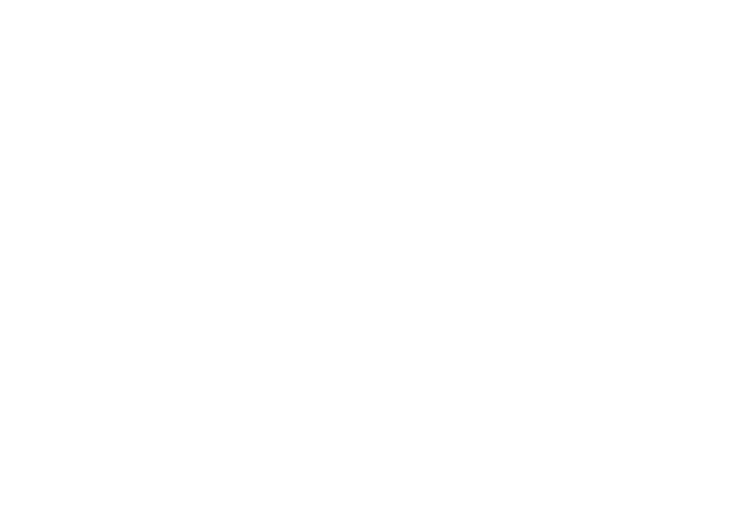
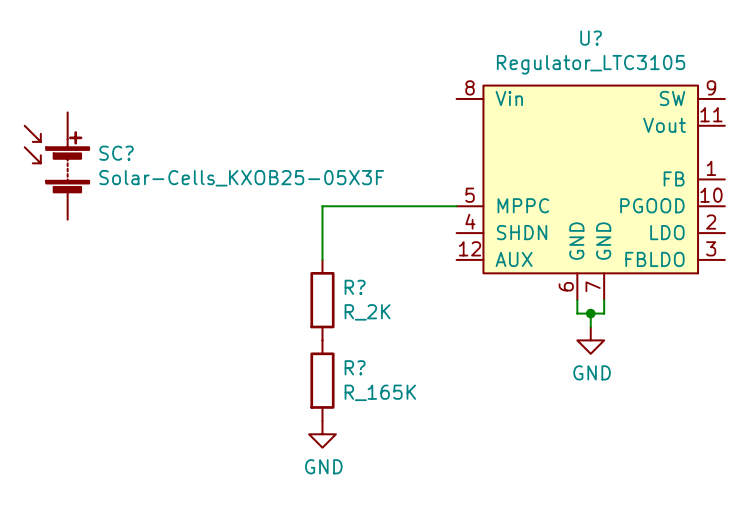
SC?: none -> Solar-Cells_KXOB25-05X3F (56, 166)
U?: none -> Regulator_LTC3105 (590, 192)
wire: none -> (456, 206) (322, 206) (322, 259)
R?: none -> R_2K (322, 300)
wire: none -> (577, 300) (577, 313) (604, 313) (604, 300)
wire: none -> (590, 313) (590, 326)
junction: none -> (590, 313)
power symbol: none -> GND (590, 340)
R?: none -> R_165K (322, 380)
power symbol: none -> GND (322, 434)

